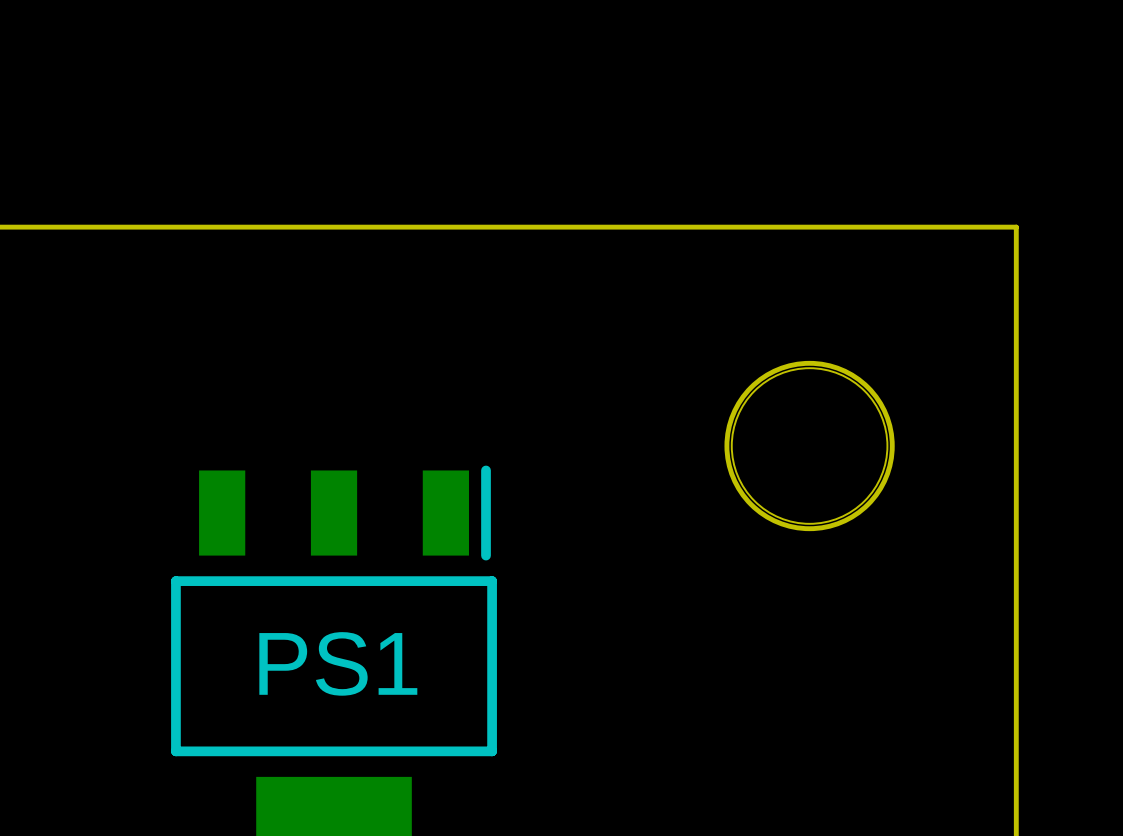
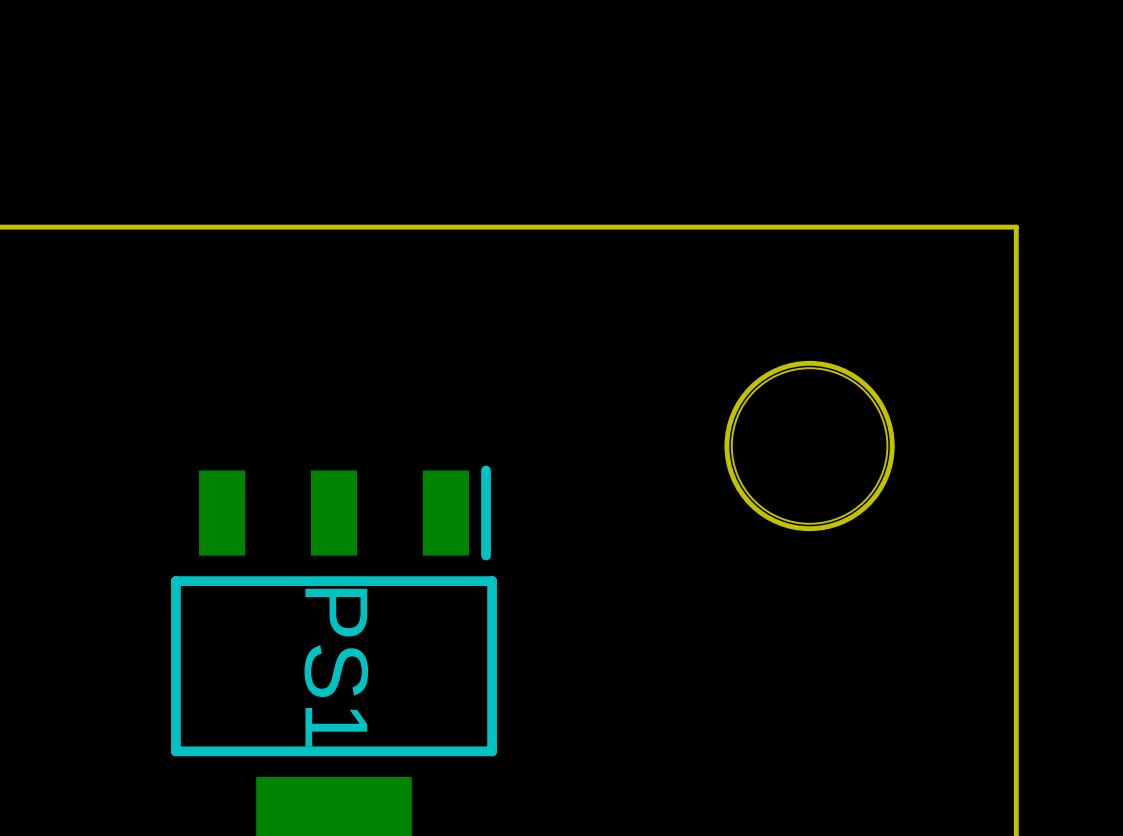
PS1 name rotation: 0° (338, 663) -> 90° clockwise (336, 667)

